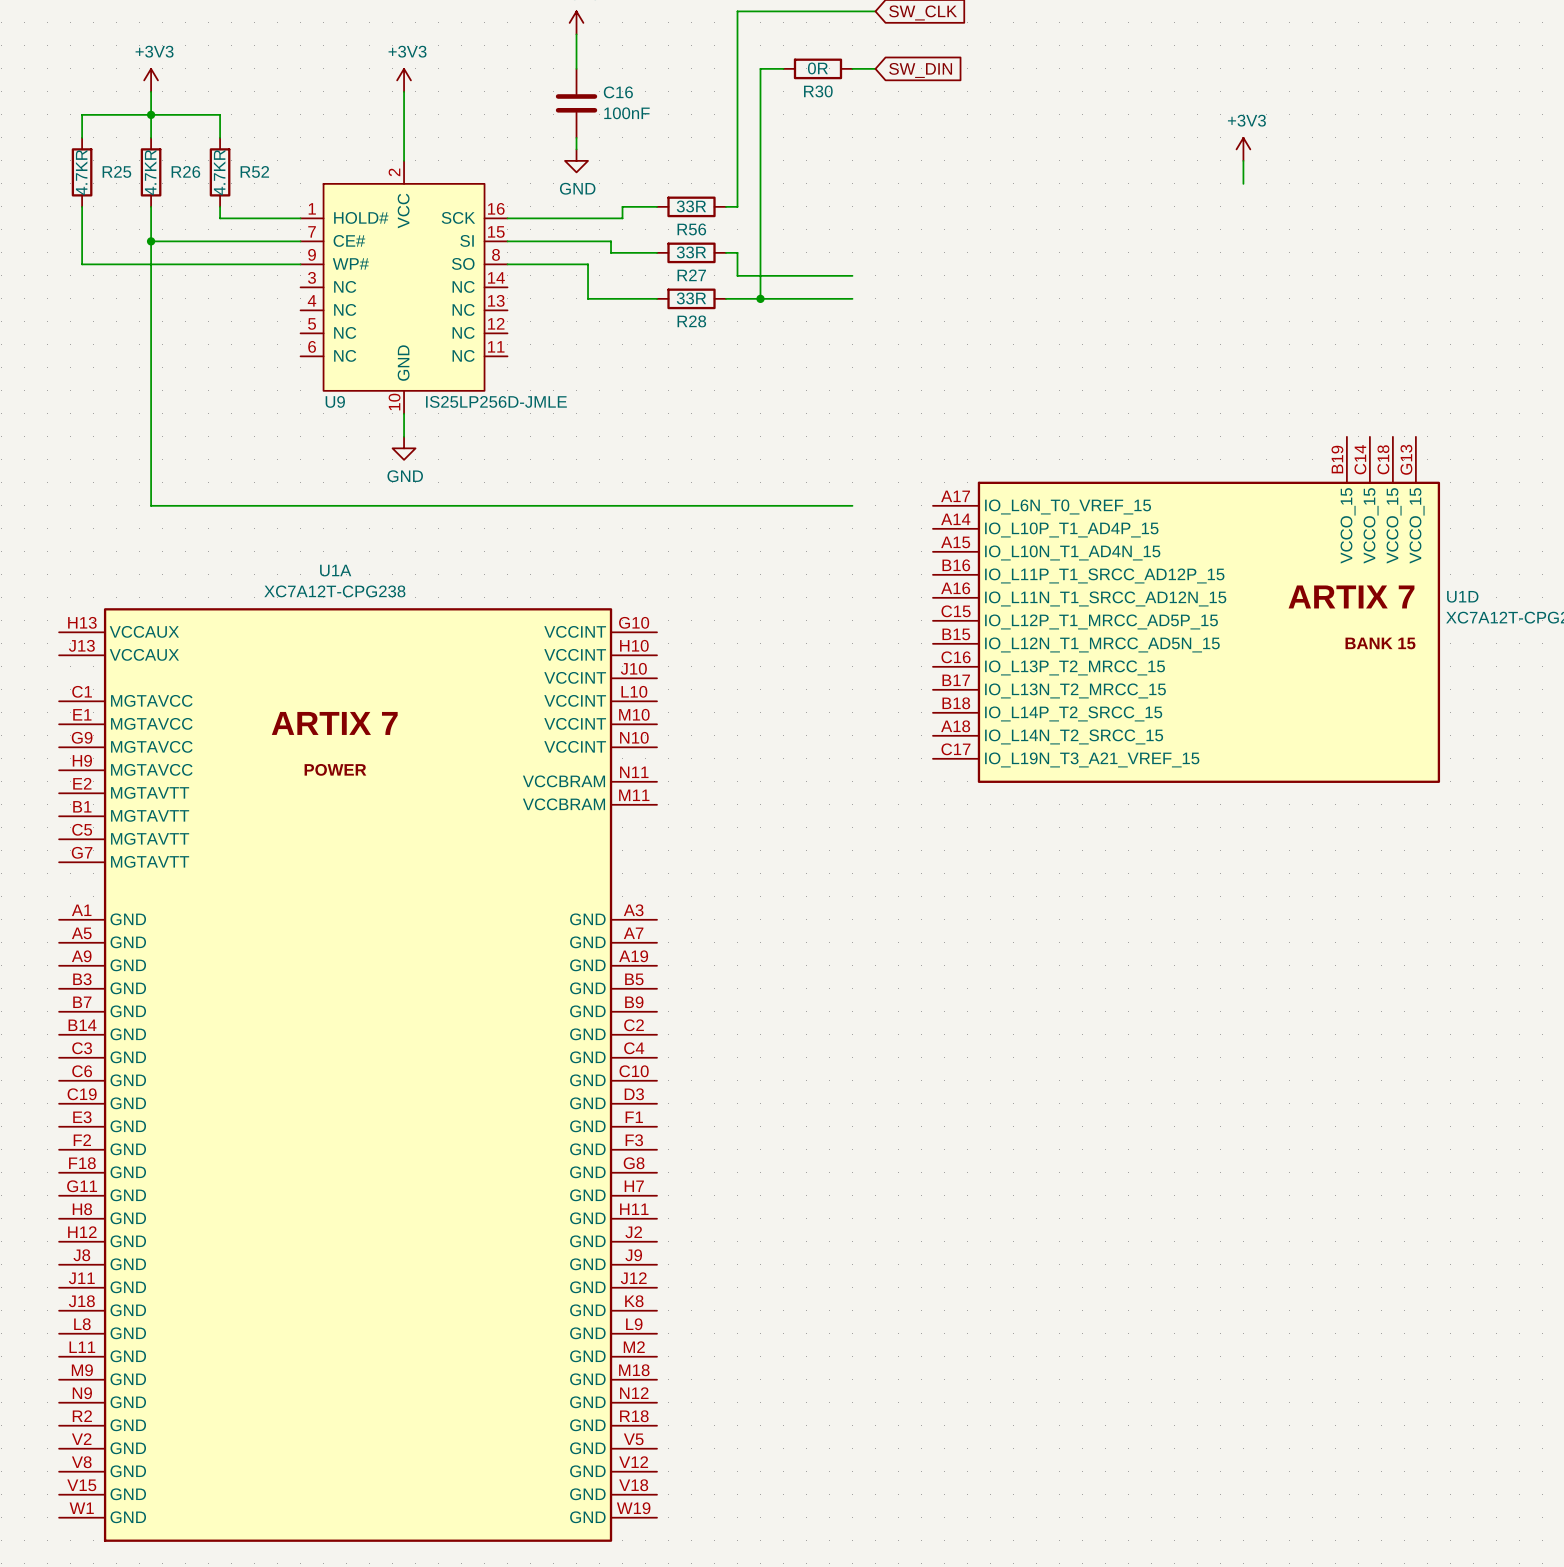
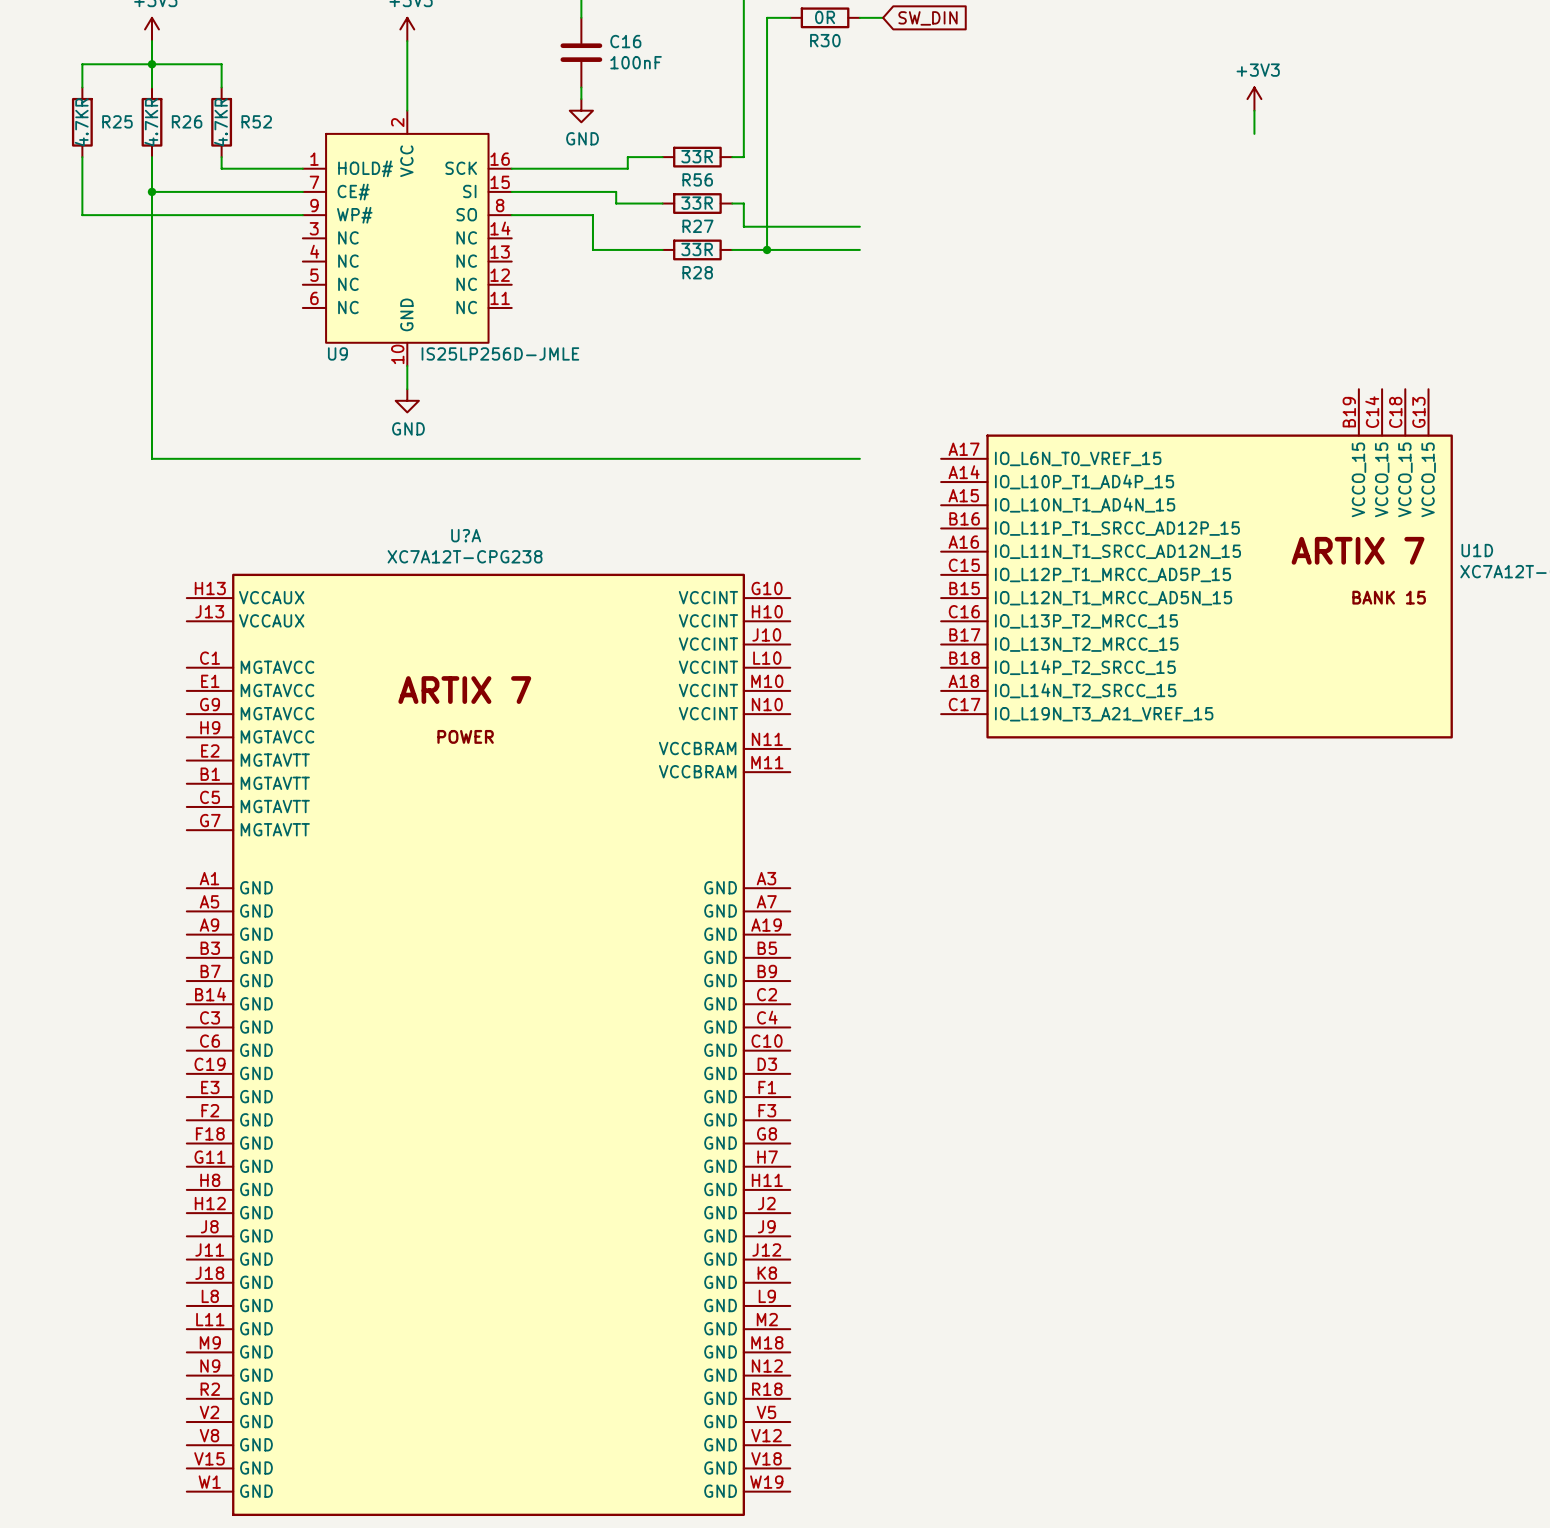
U1A: XC7A12T-CPG238 (358, 1075) -> none
U?A: none -> XC7A12T-CPG238 (488, 1044)

